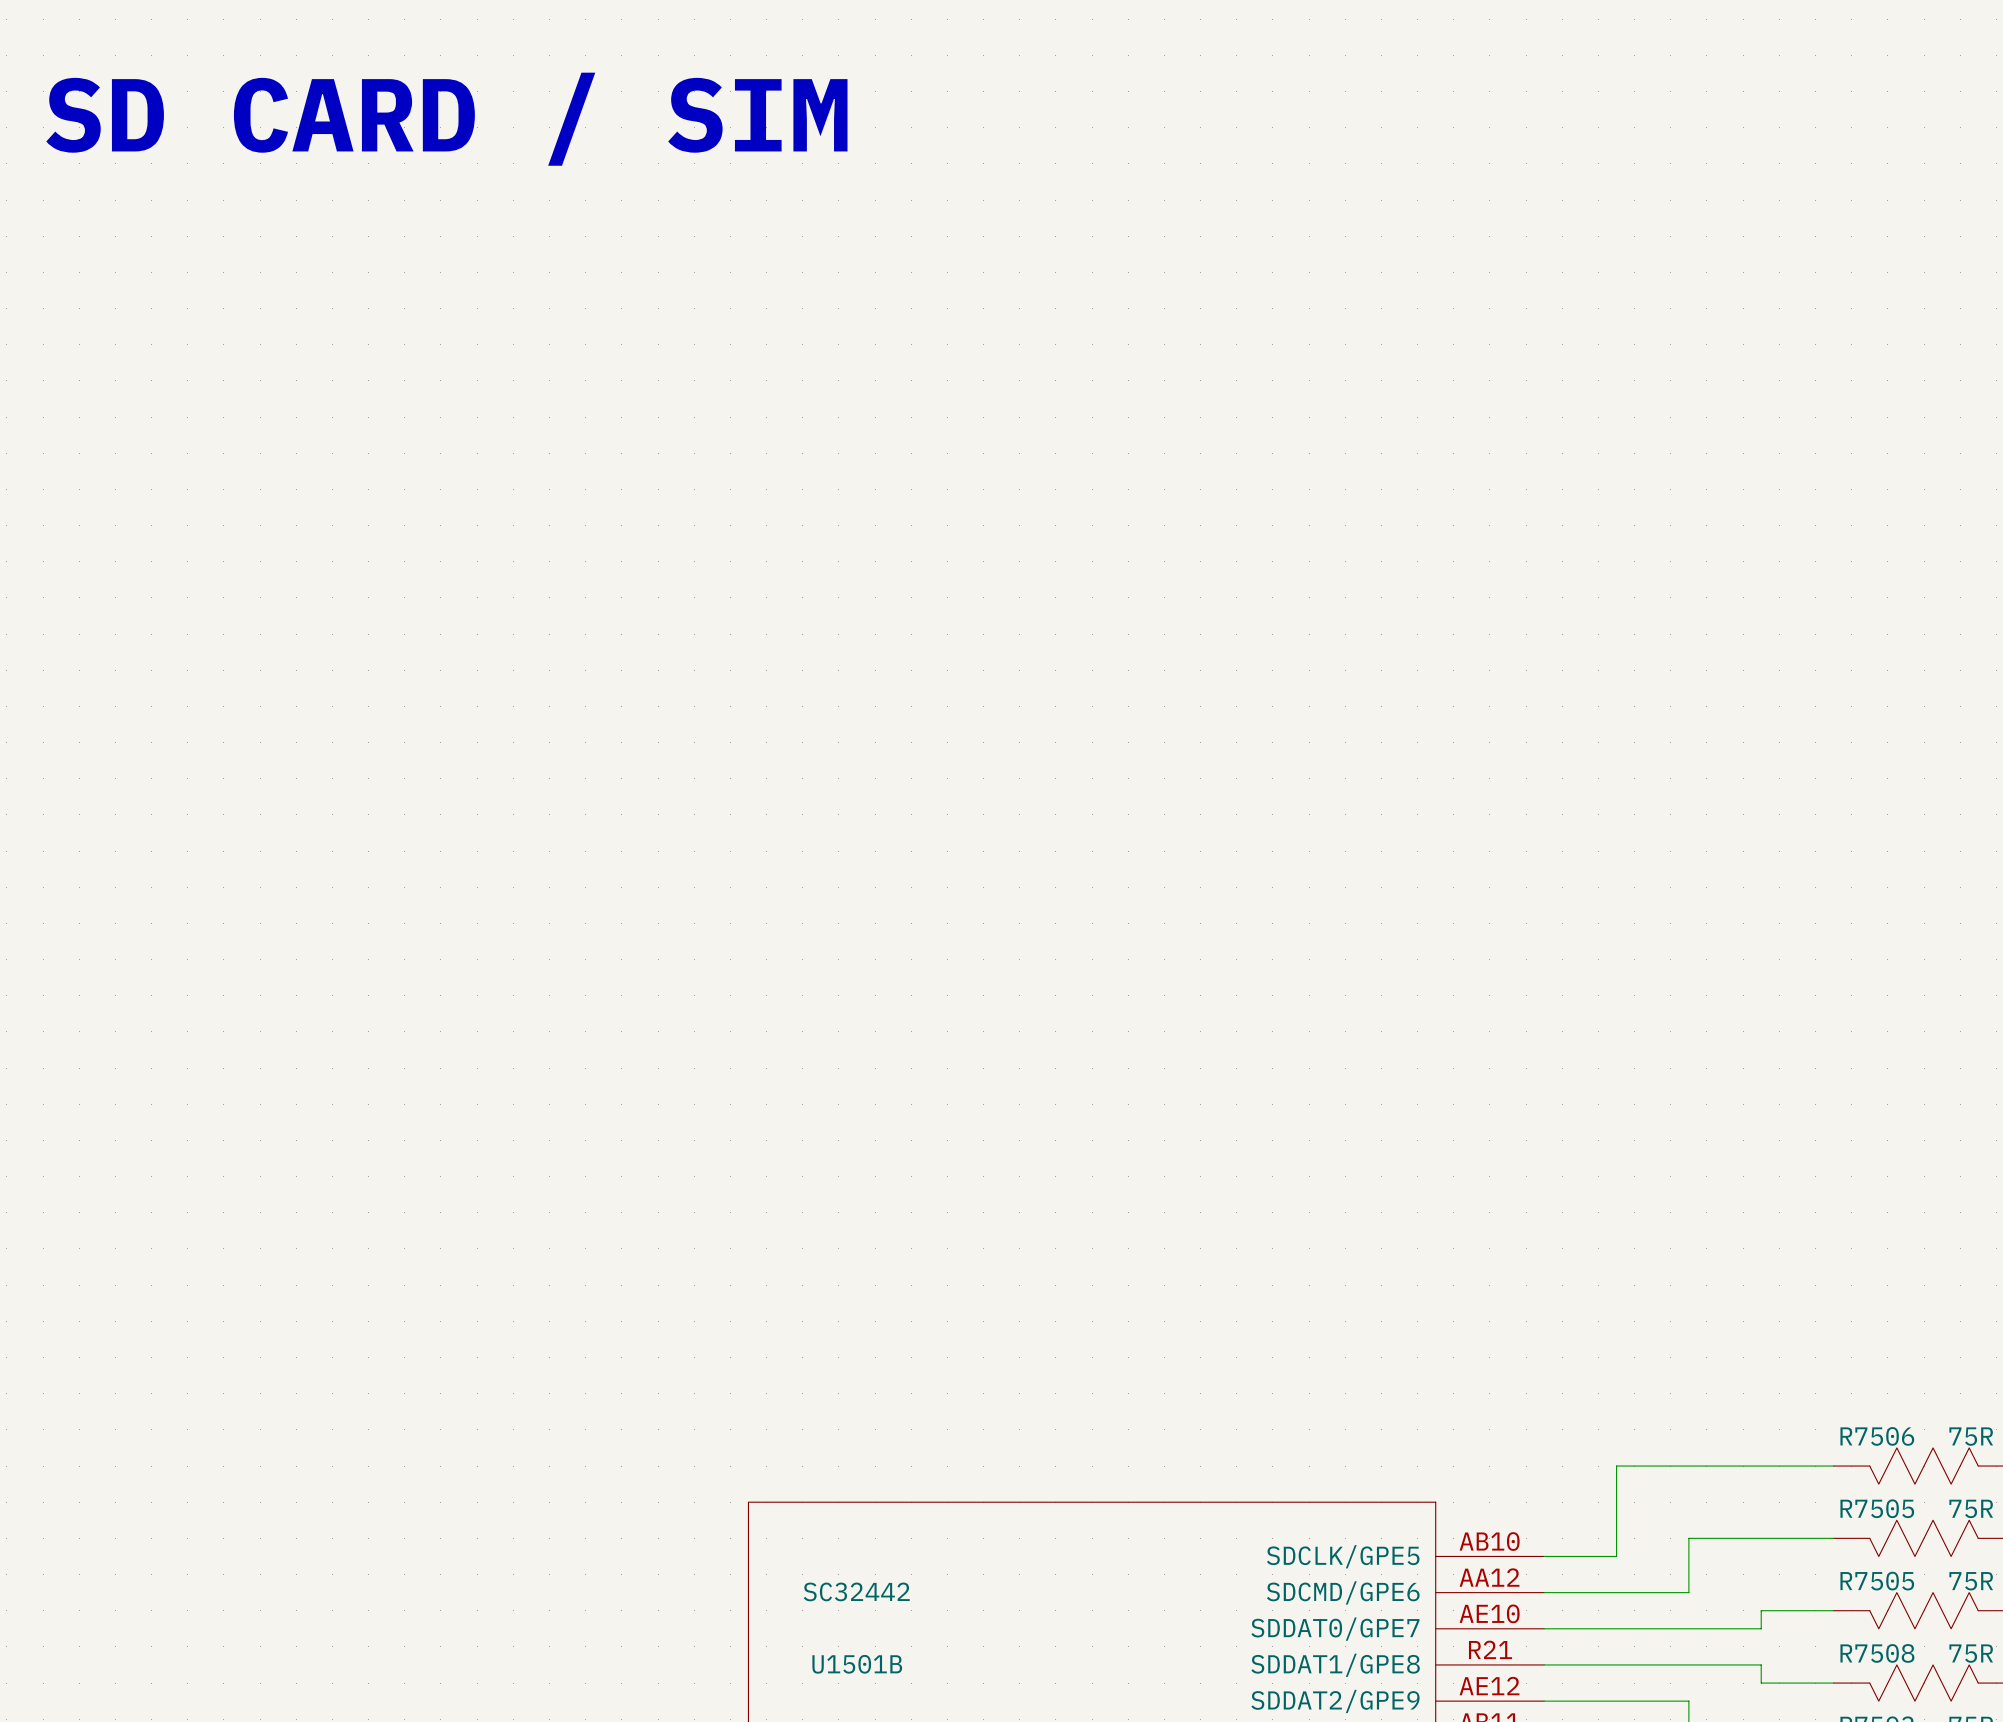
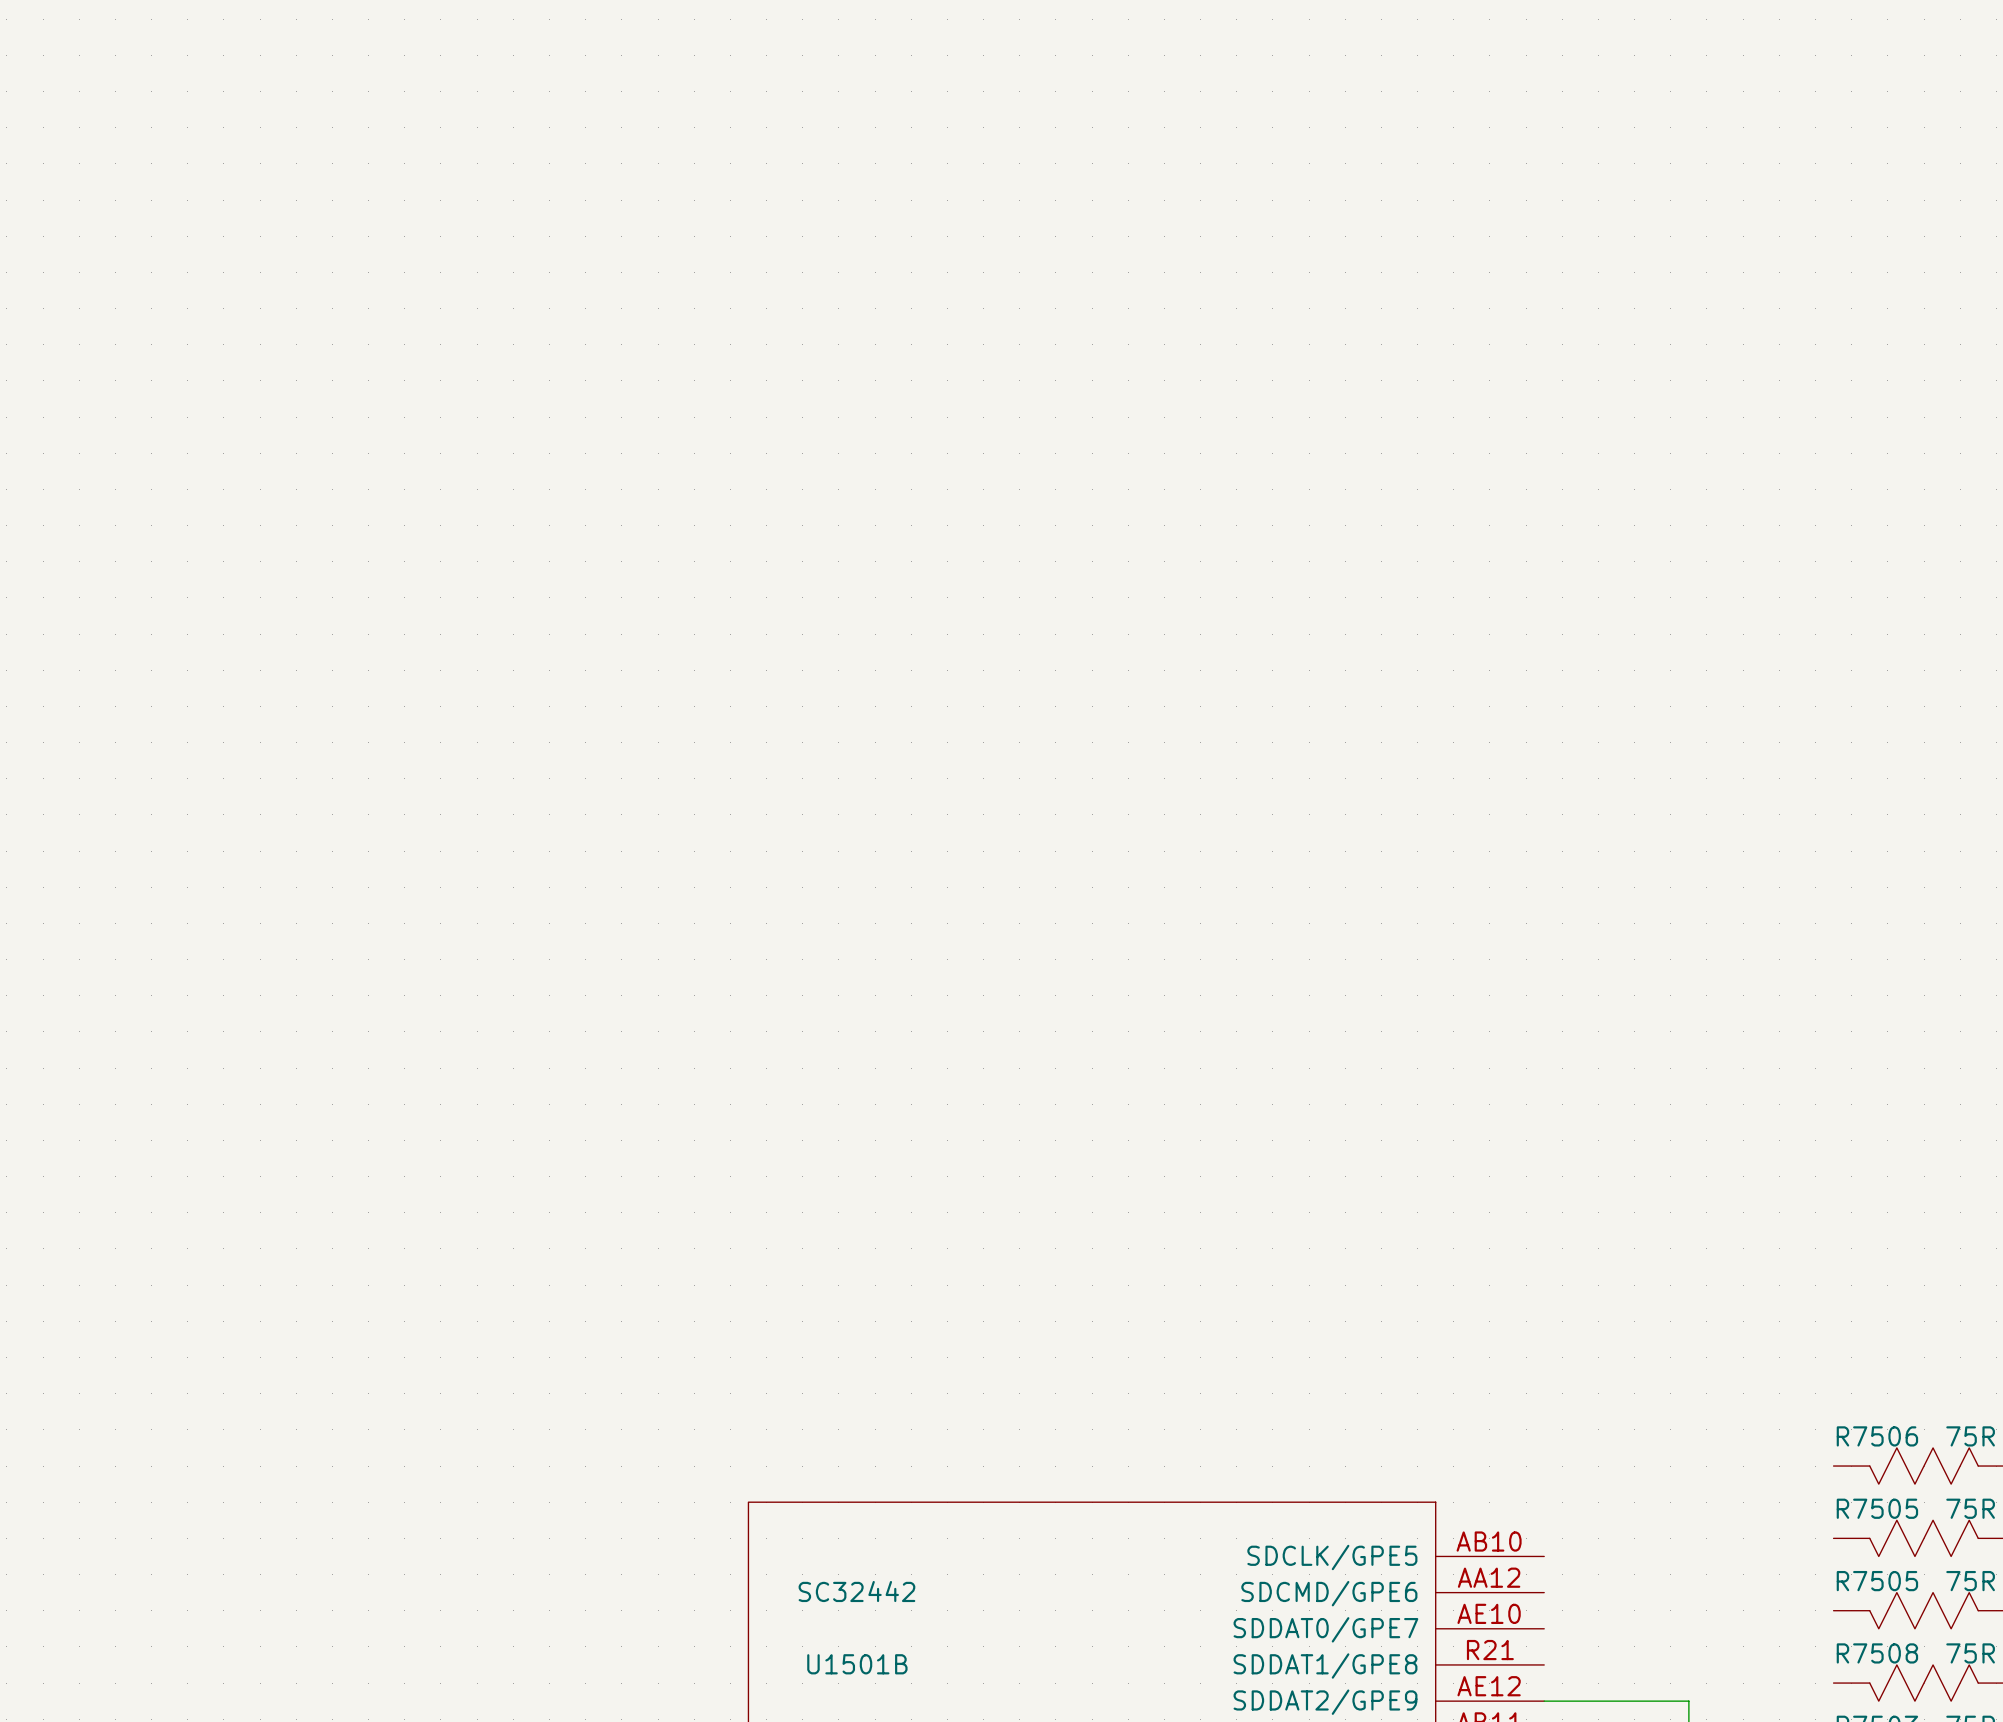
text: SD CARD / SIM (446, 119) -> none
wire: (1833, 1466) (1616, 1466) (1616, 1556) (1544, 1556) -> none
wire: (1833, 1538) (1688, 1538) (1688, 1592) (1544, 1592) -> none
wire: (1833, 1610) (1761, 1610) (1761, 1628) (1544, 1628) -> none
wire: (1544, 1664) (1761, 1664) (1761, 1683) (1833, 1683) -> none

